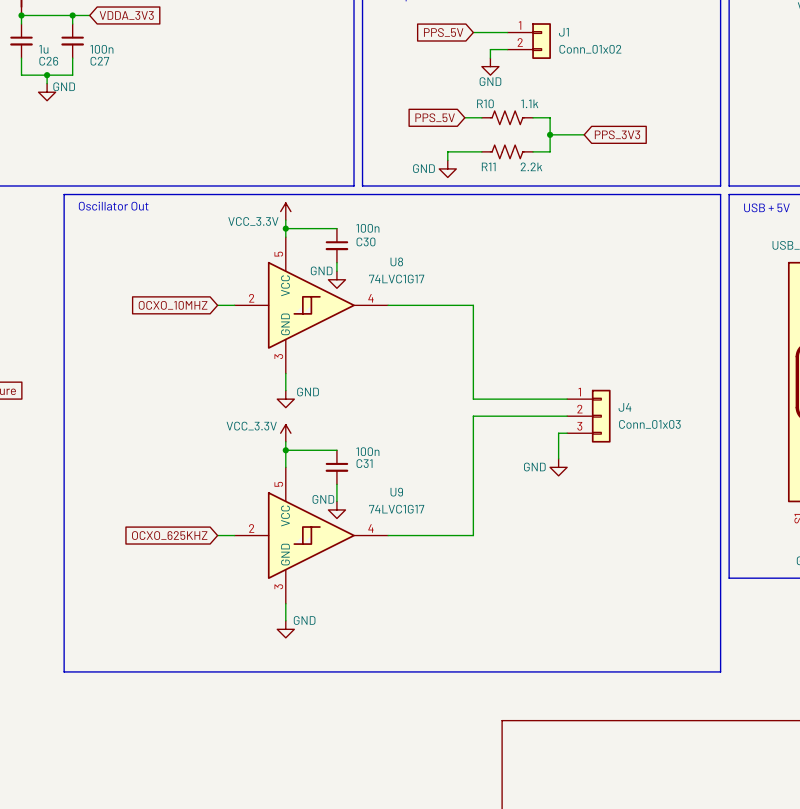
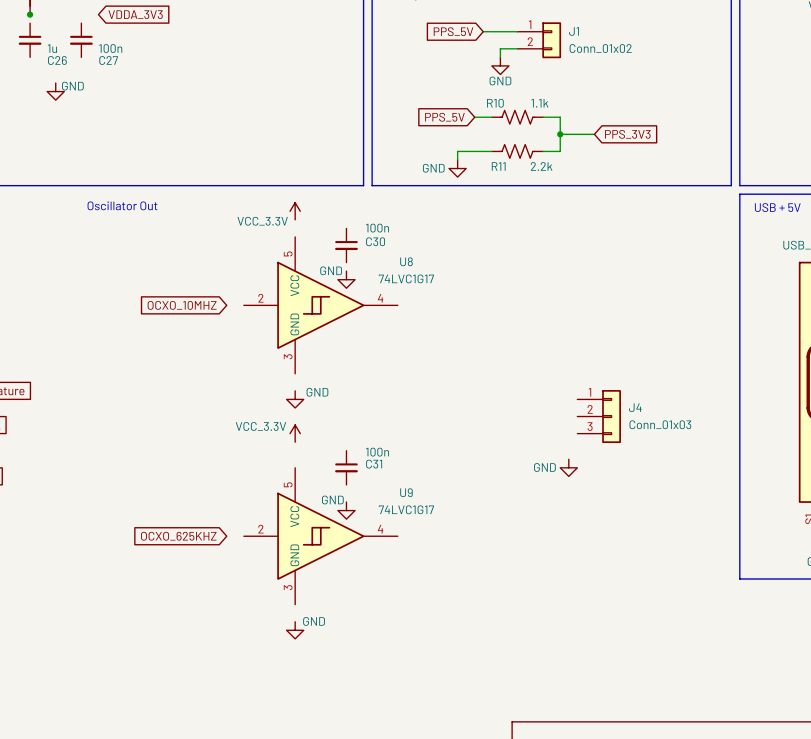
wire: (72, 15) (72, 24) -> none
junction: (72, 15) -> none
wire: (89, 15) (21, 15) (21, 24) -> none
wire: (21, 58) (21, 75) (72, 75) (72, 58) -> none
wire: (47, 75) (47, 83) -> none
junction: (47, 75) -> none
line: (64, 194) (720, 194) (720, 671) (64, 671) (64, 194) -> none
wire: (285, 220) (285, 237) -> none
wire: (285, 228) (336, 228) -> none
junction: (285, 228) -> none
wire: (336, 262) (336, 271) -> none
wire: (217, 305) (234, 305) -> none
wire: (388, 305) (473, 305) (473, 399) (567, 399) -> none
wire: (285, 373) (285, 390) -> none
wire: (567, 416) (473, 416) (473, 535) (388, 535) -> none
wire: (567, 433) (558, 433) (558, 458) -> none
wire: (285, 441) (285, 467) -> none
wire: (285, 450) (336, 450) -> none
junction: (285, 450) -> none
wire: (336, 484) (336, 501) -> none
wire: (217, 535) (234, 535) -> none
wire: (285, 603) (285, 620) -> none

